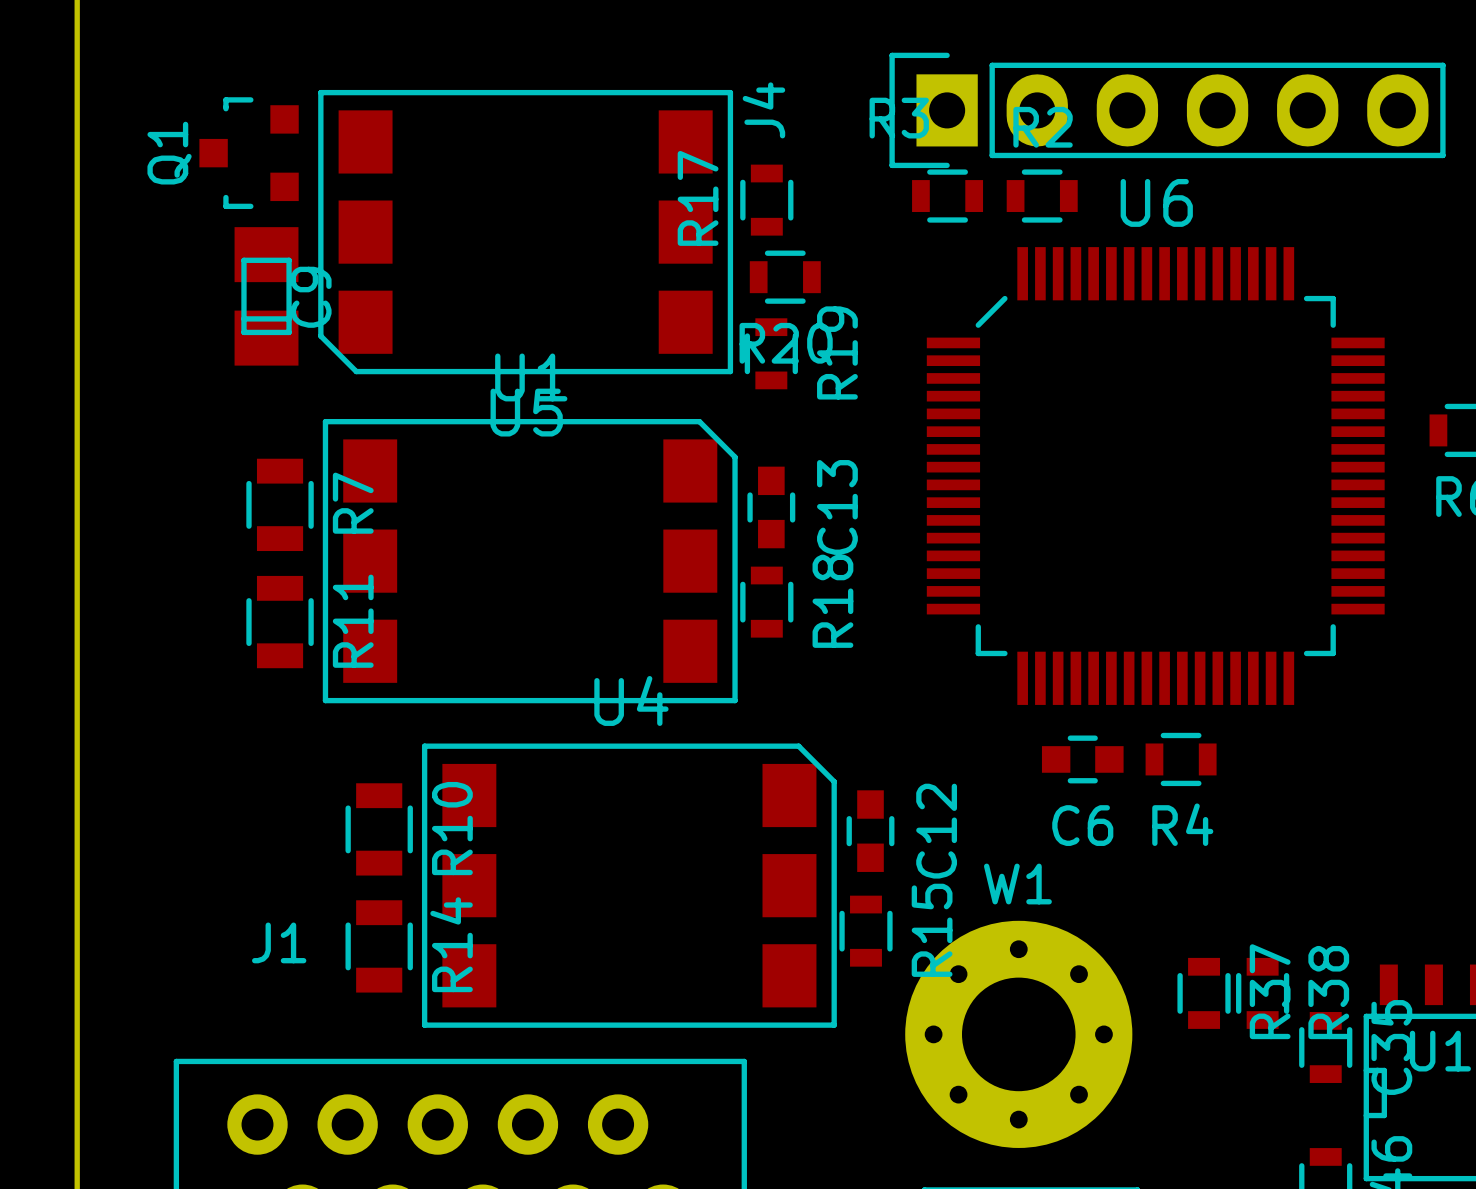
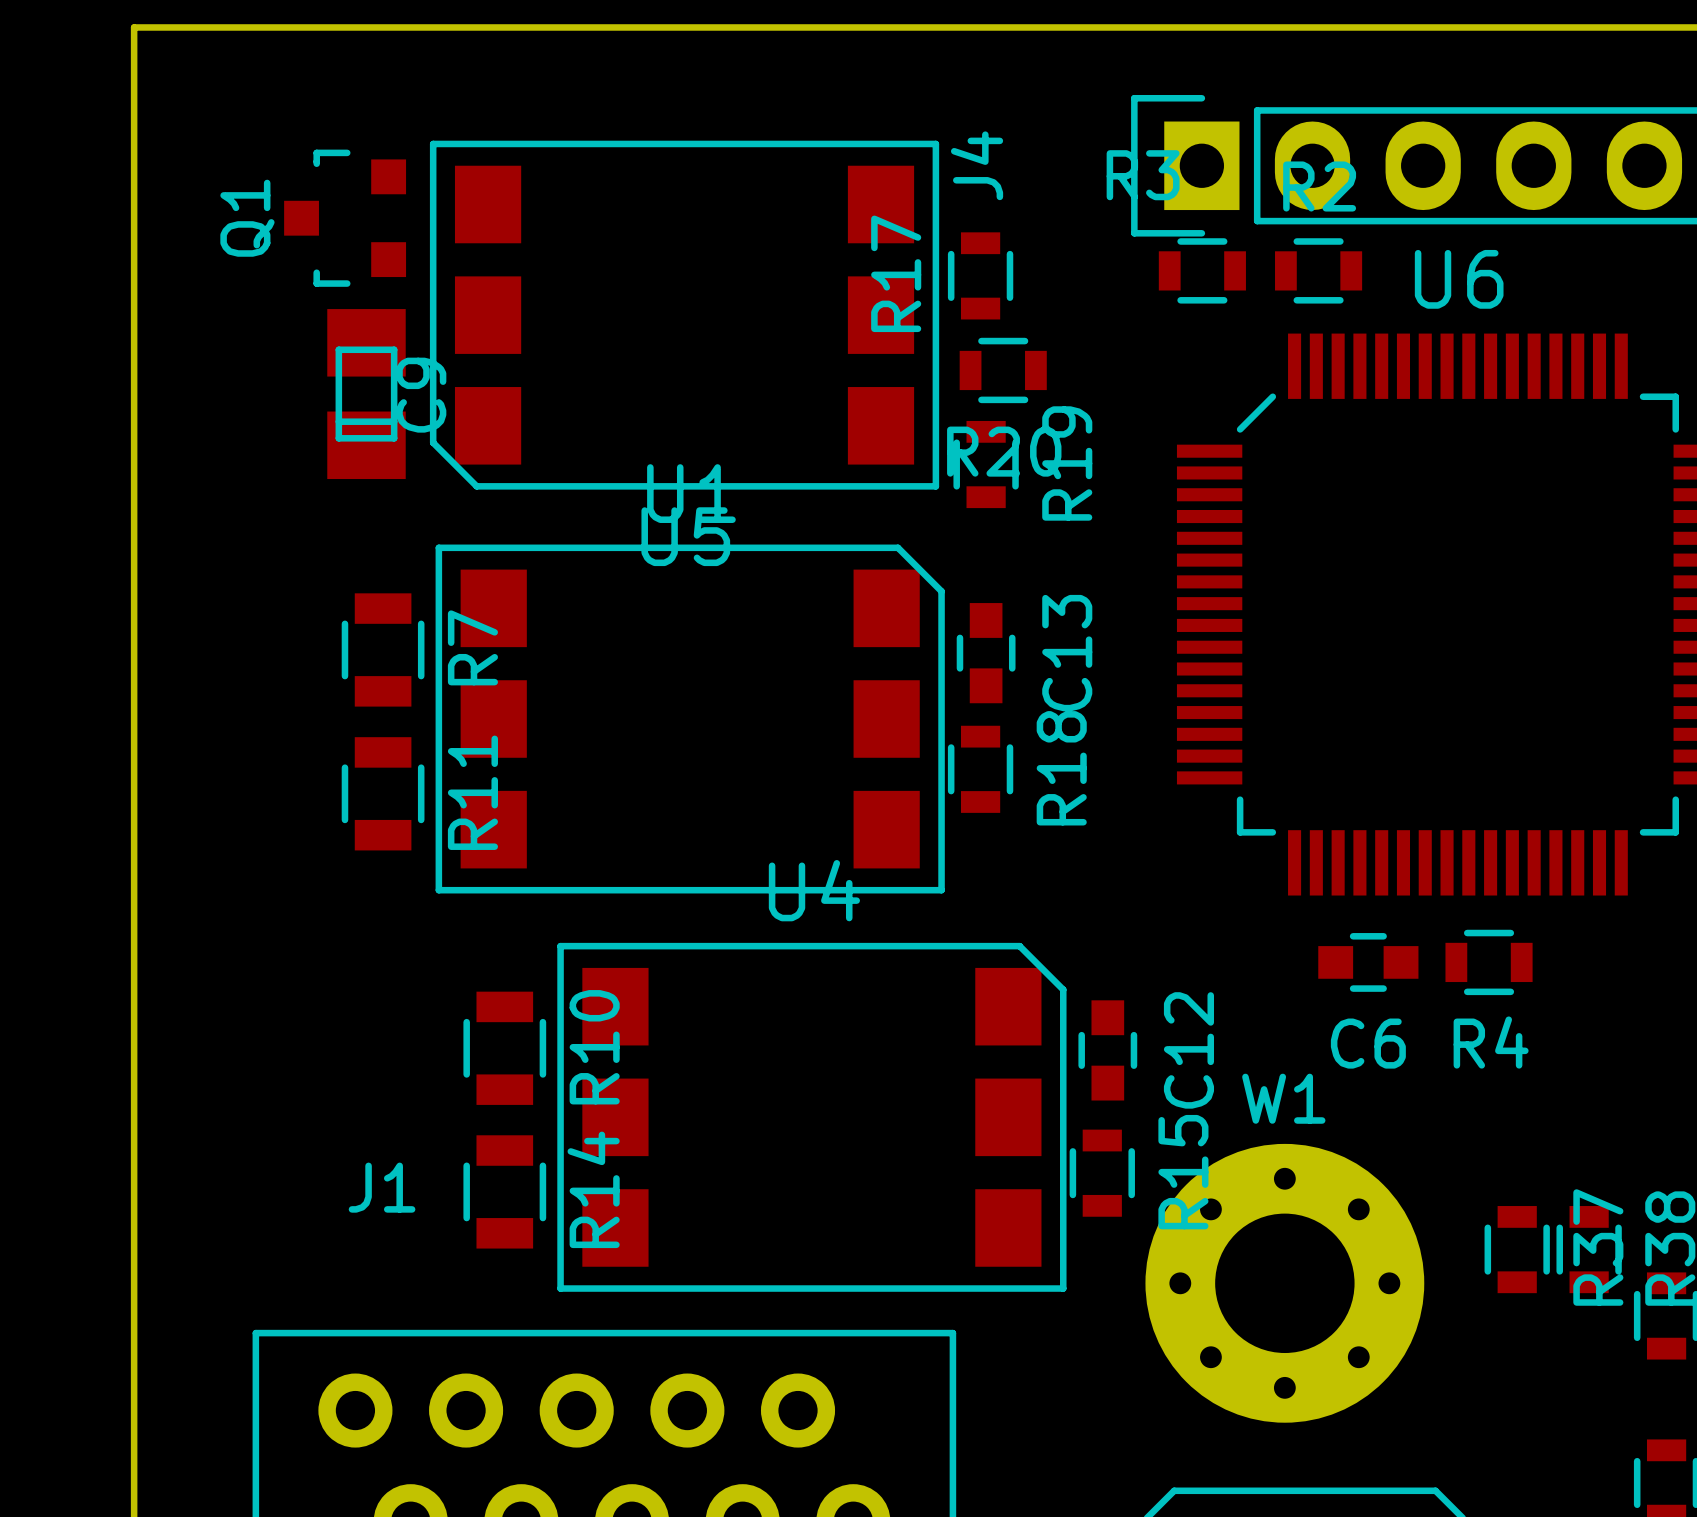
W1 position: (1018, 1034) -> (1284, 1283)

